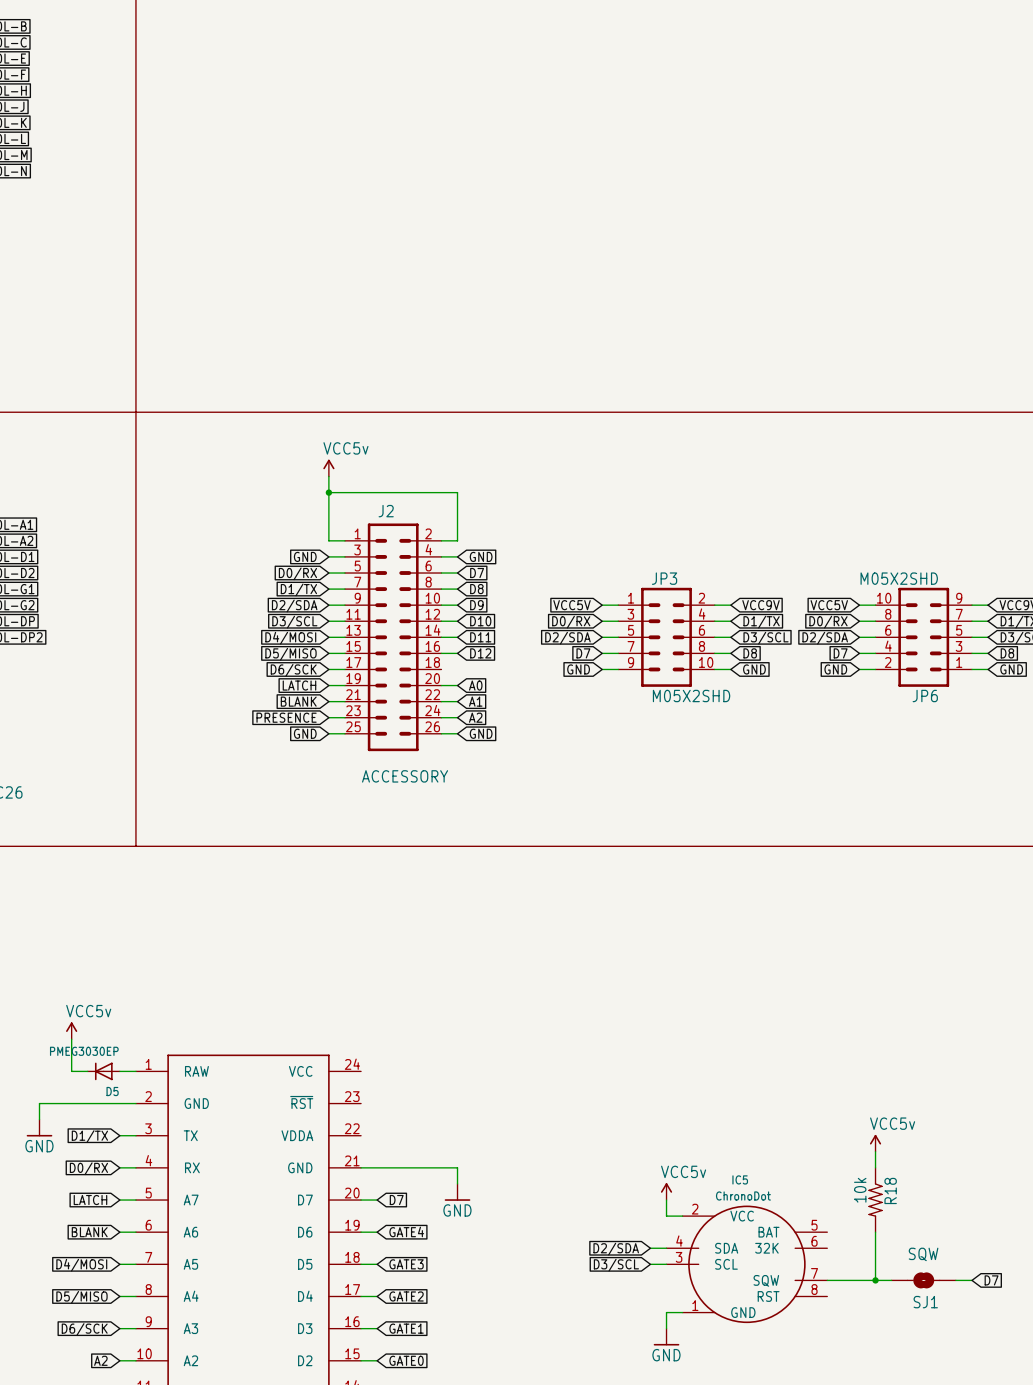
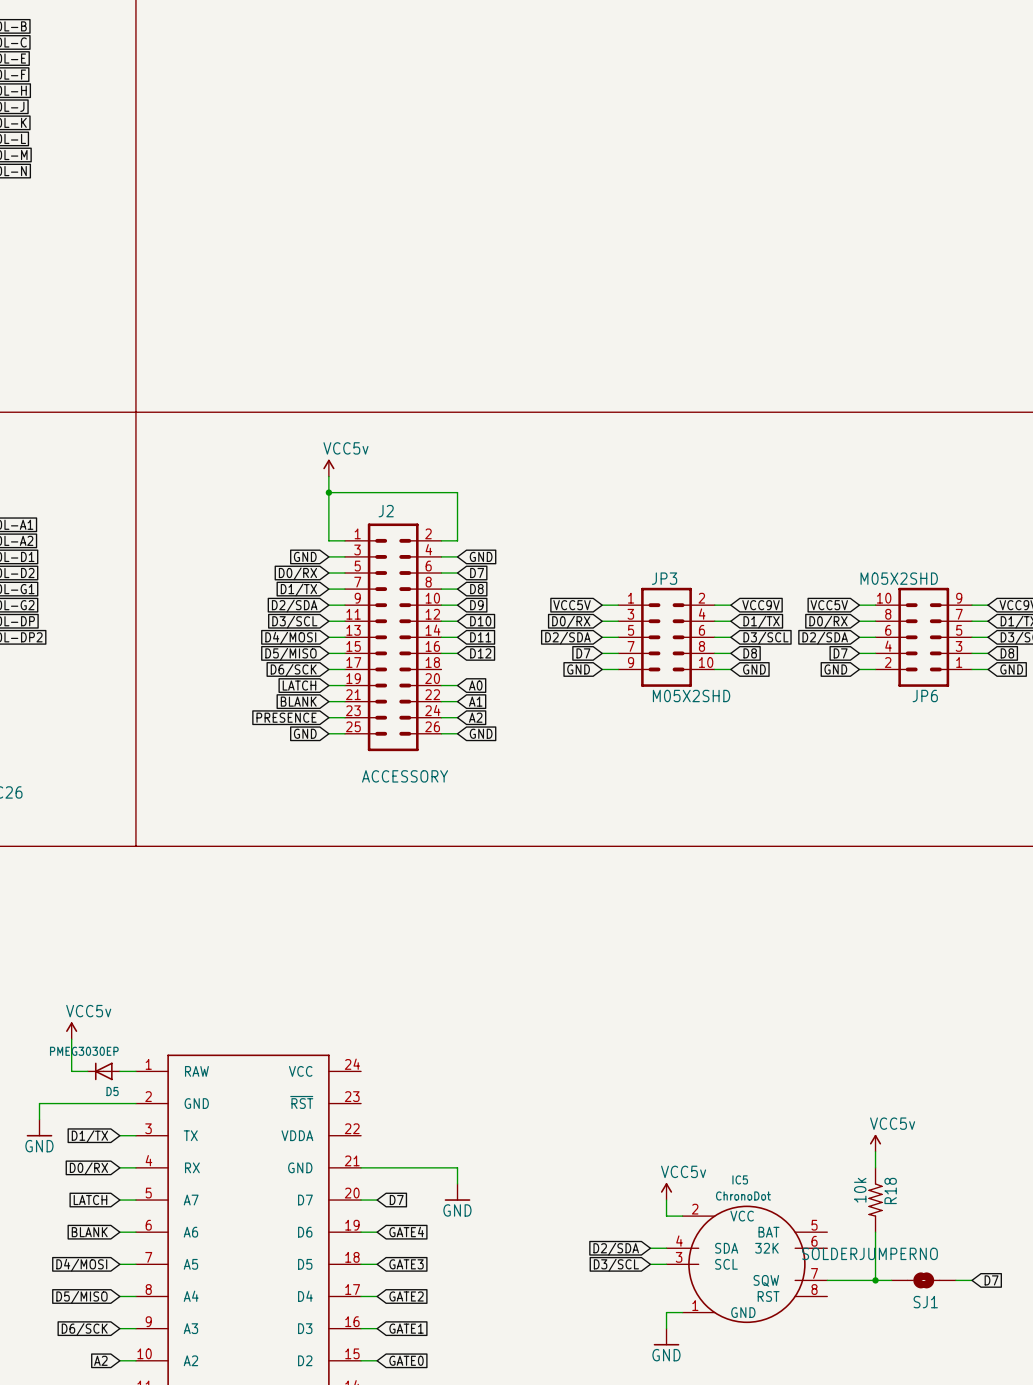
SJ1 value: SQW (923, 1254) -> SOLDERJUMPERNO (870, 1253)

